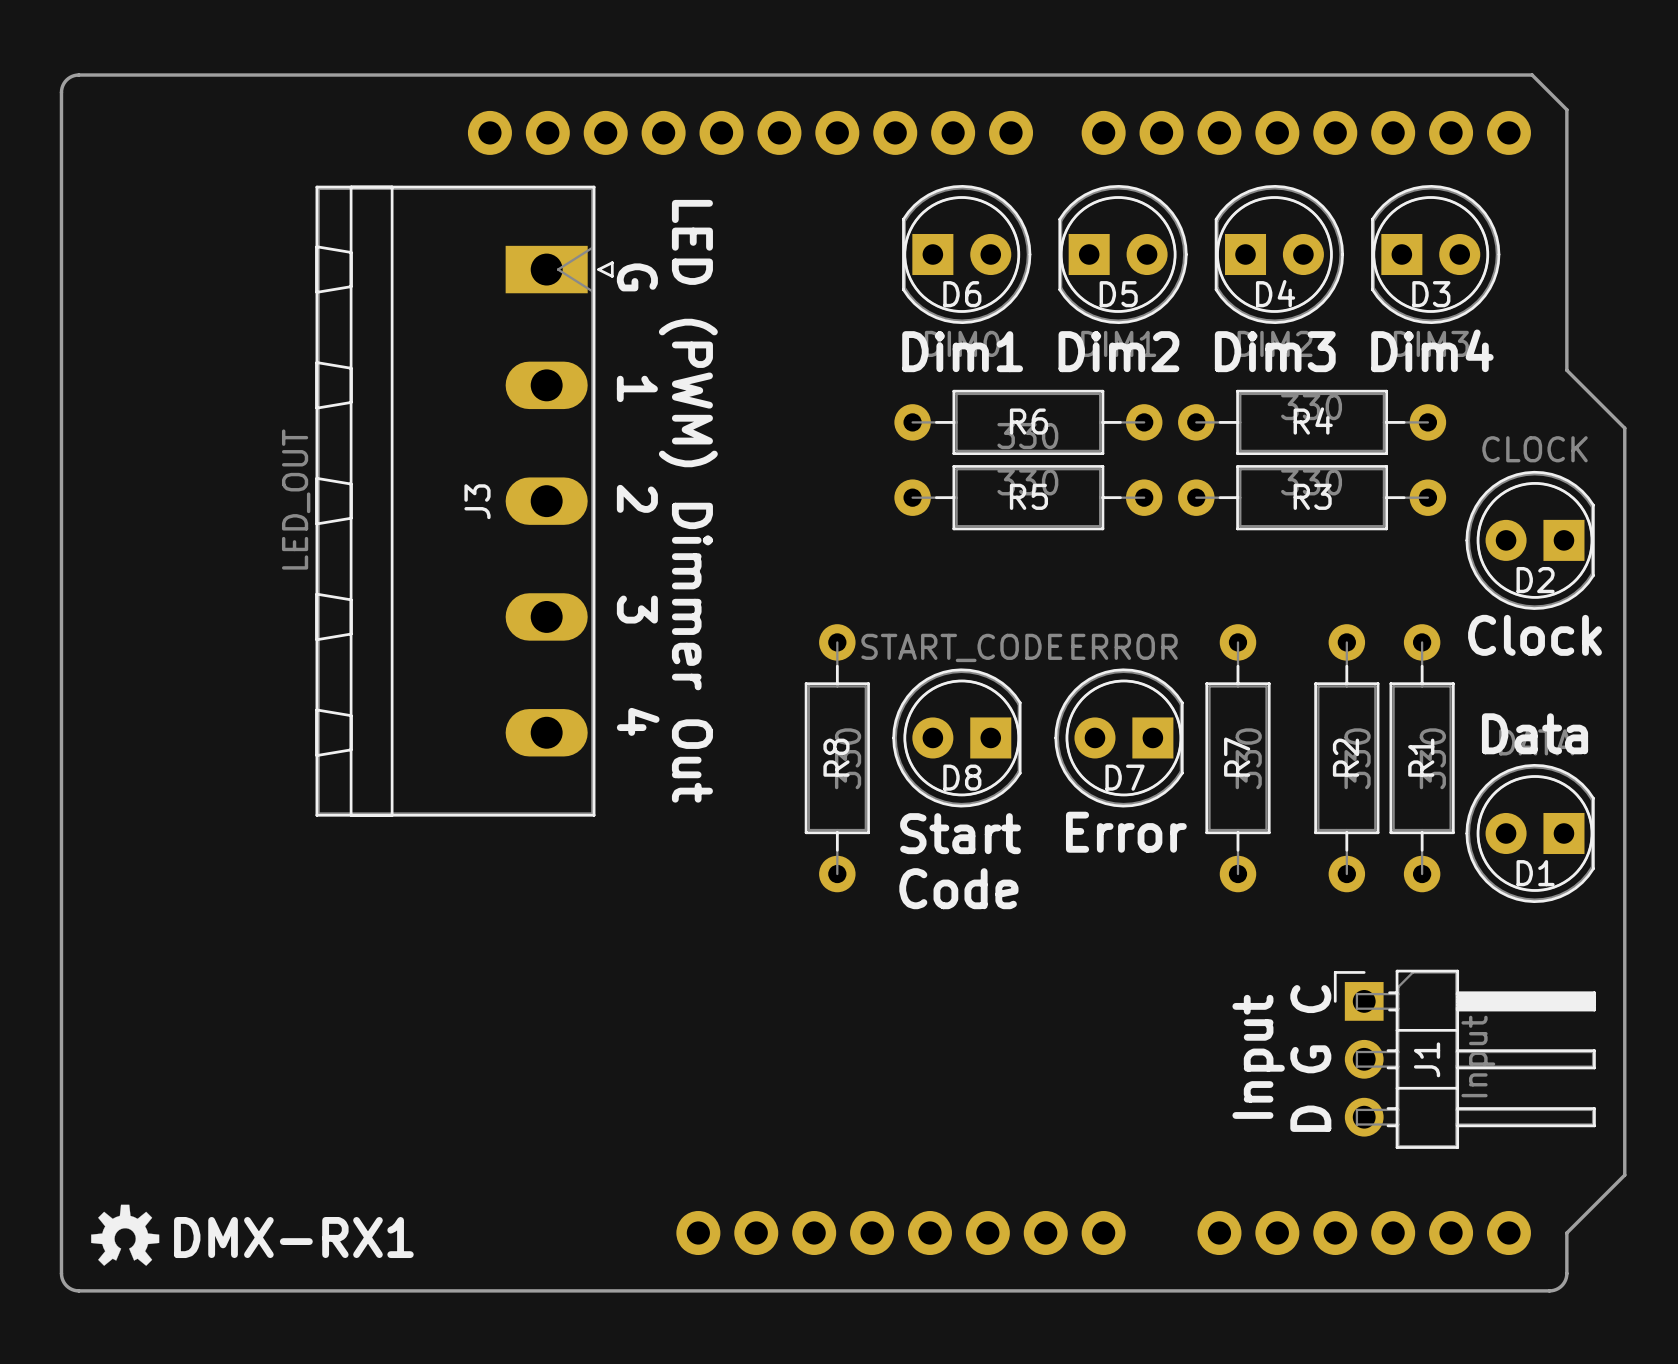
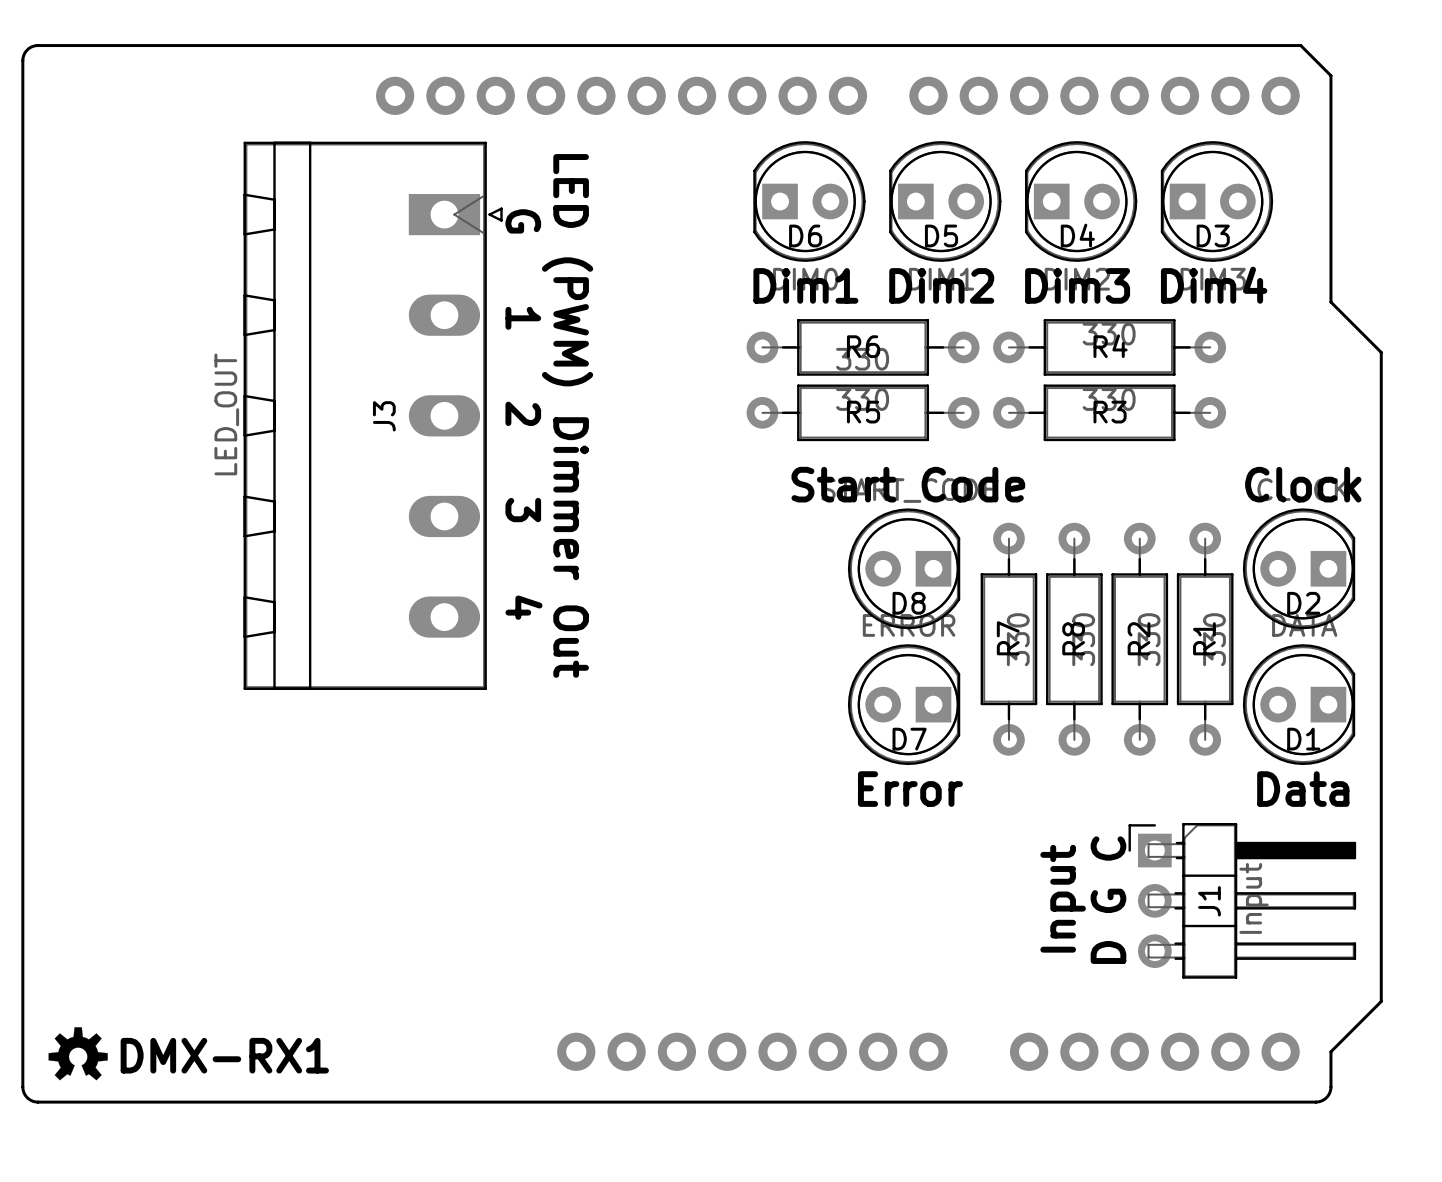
D2 position: (1530, 540) -> (1299, 568)
text: none -> Start Code (908, 484)
text position: Clock (1535, 635) -> Clock (1303, 484)
text position: Data (1535, 733) -> Data (1303, 789)
D8 position: (956, 737) -> (904, 568)
D7 position: (1119, 737) -> (904, 704)
R8 position: (837, 758) -> (1074, 639)
R7 position: (1237, 758) -> (1008, 639)
text position: Error (1126, 832) -> Error (910, 789)
text: Start (960, 833) -> none
text: Code (958, 888) -> none

